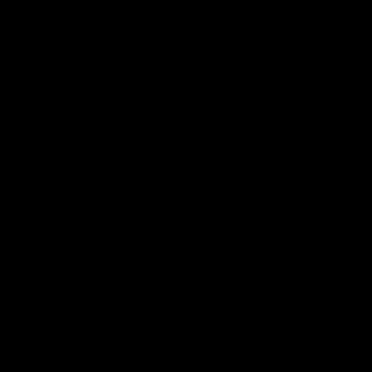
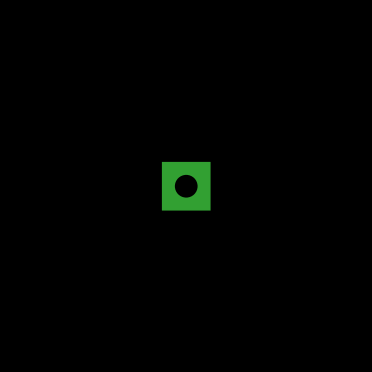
part: none -> (186, 186)

